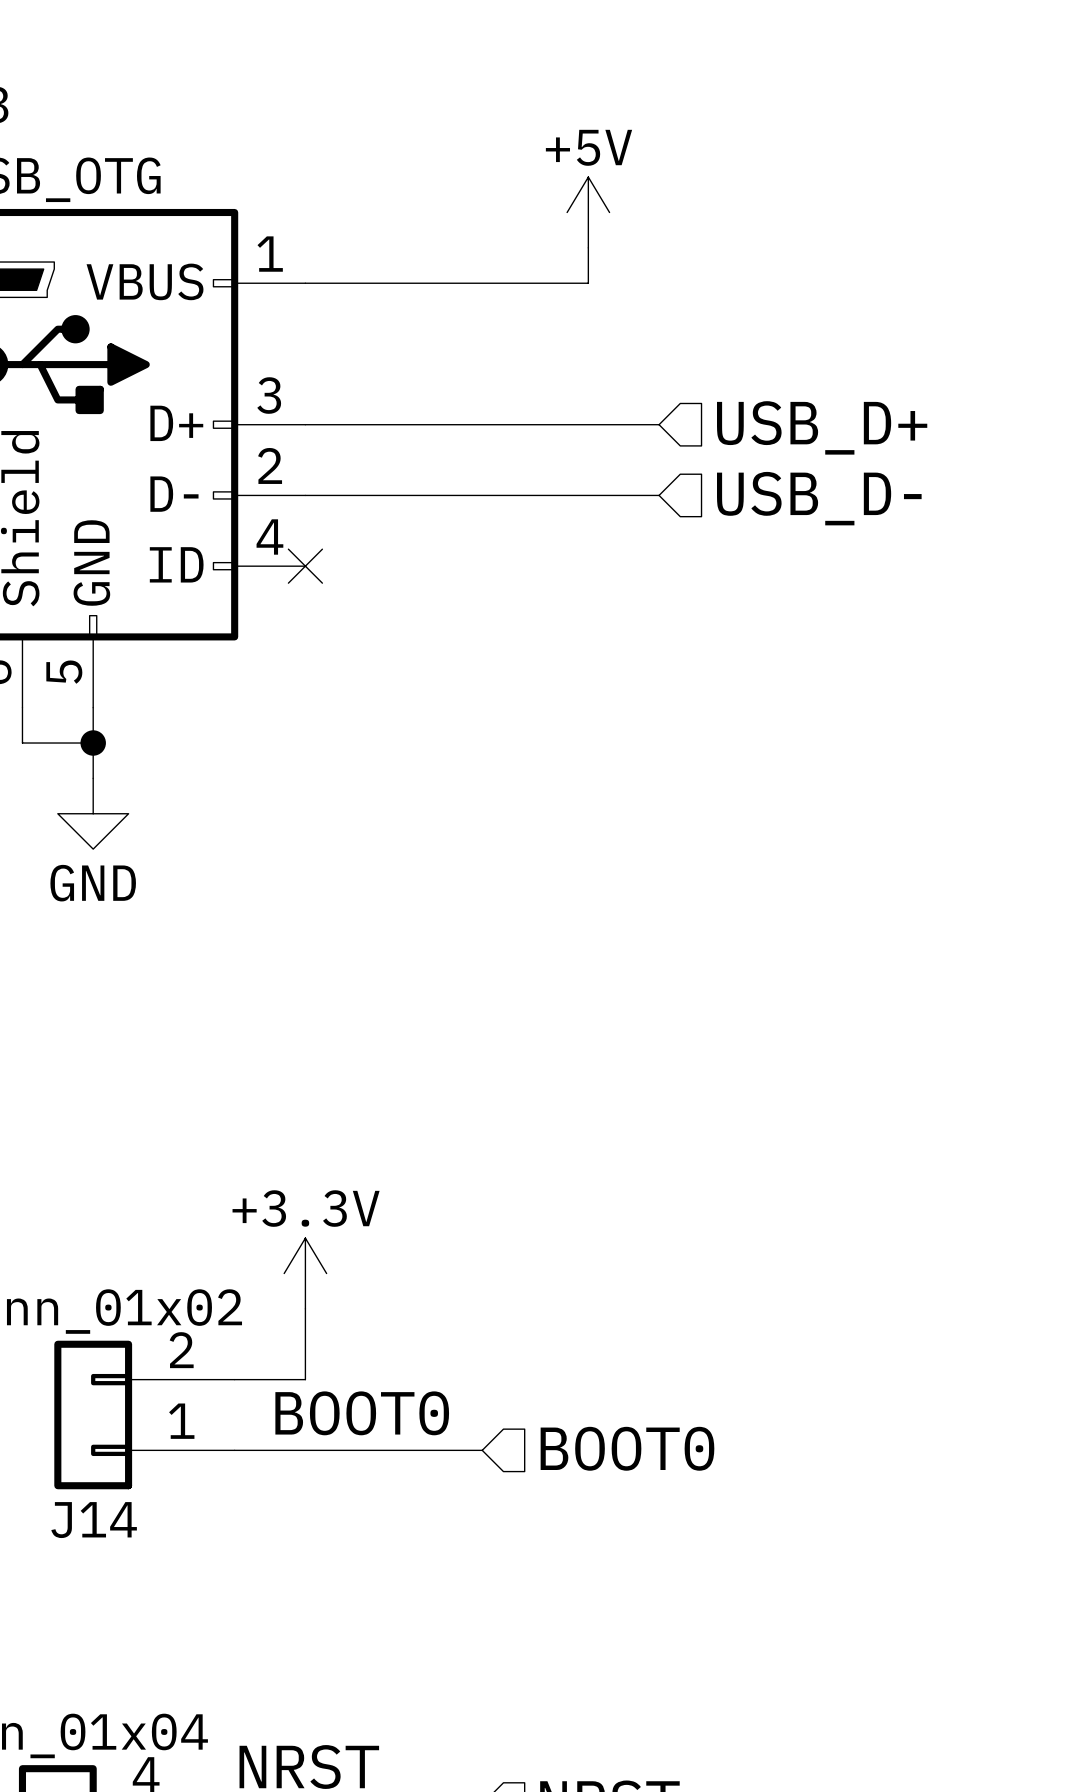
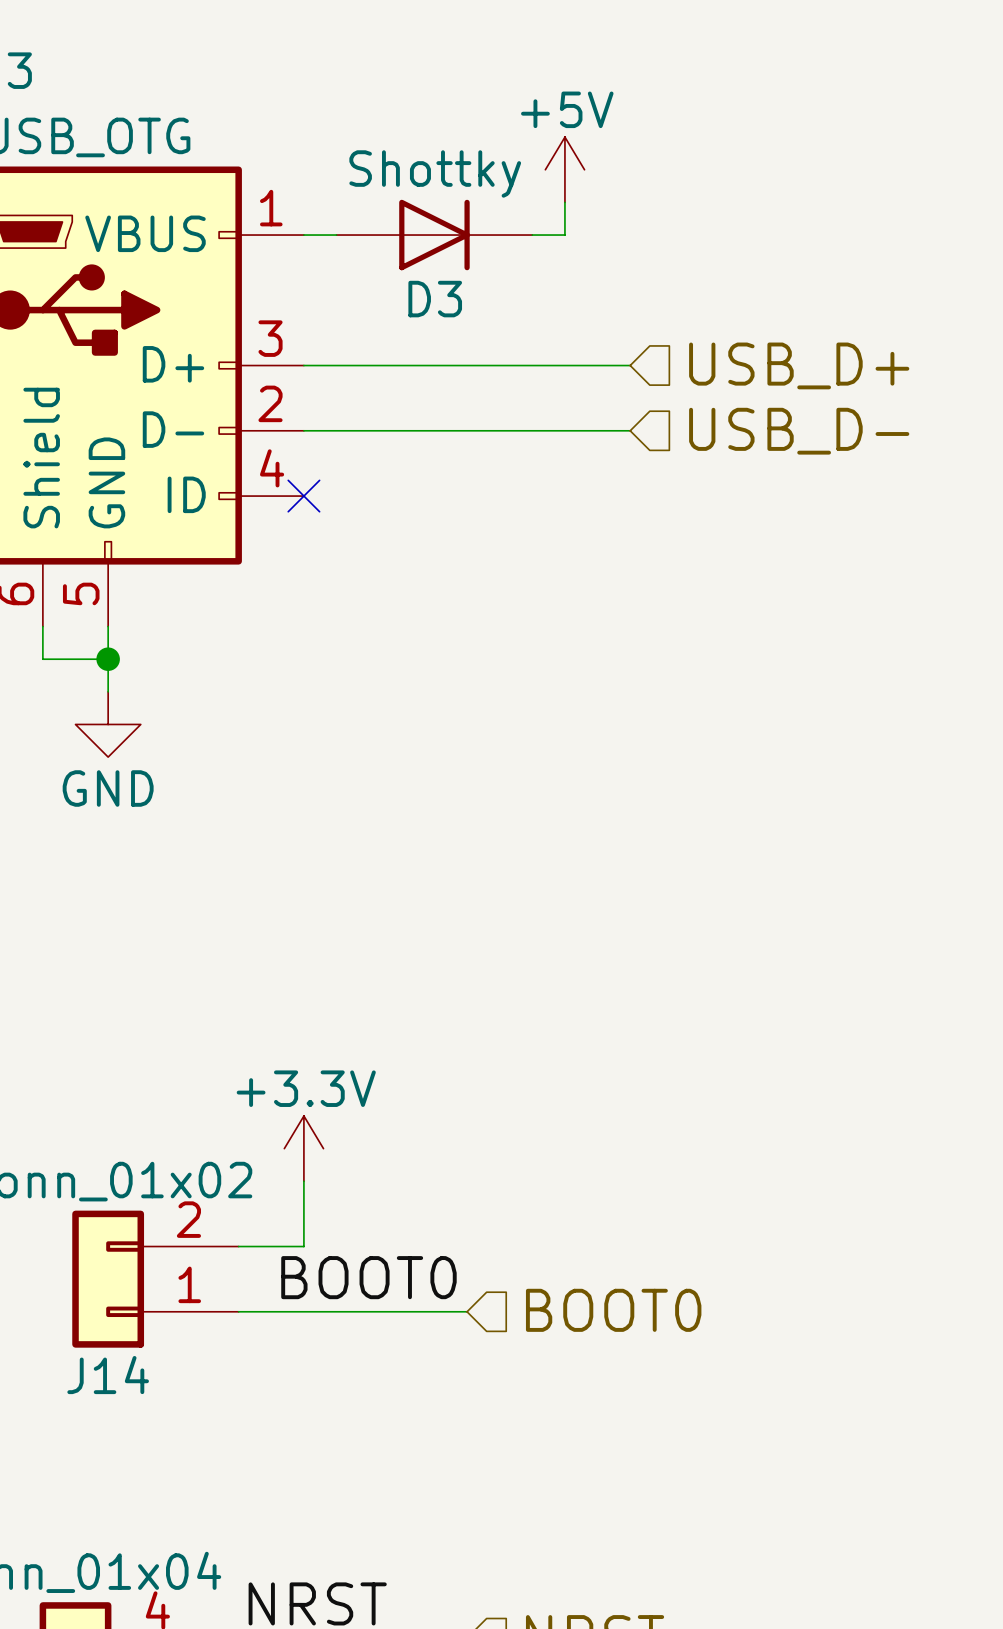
D3: none -> Shottky (434, 235)

